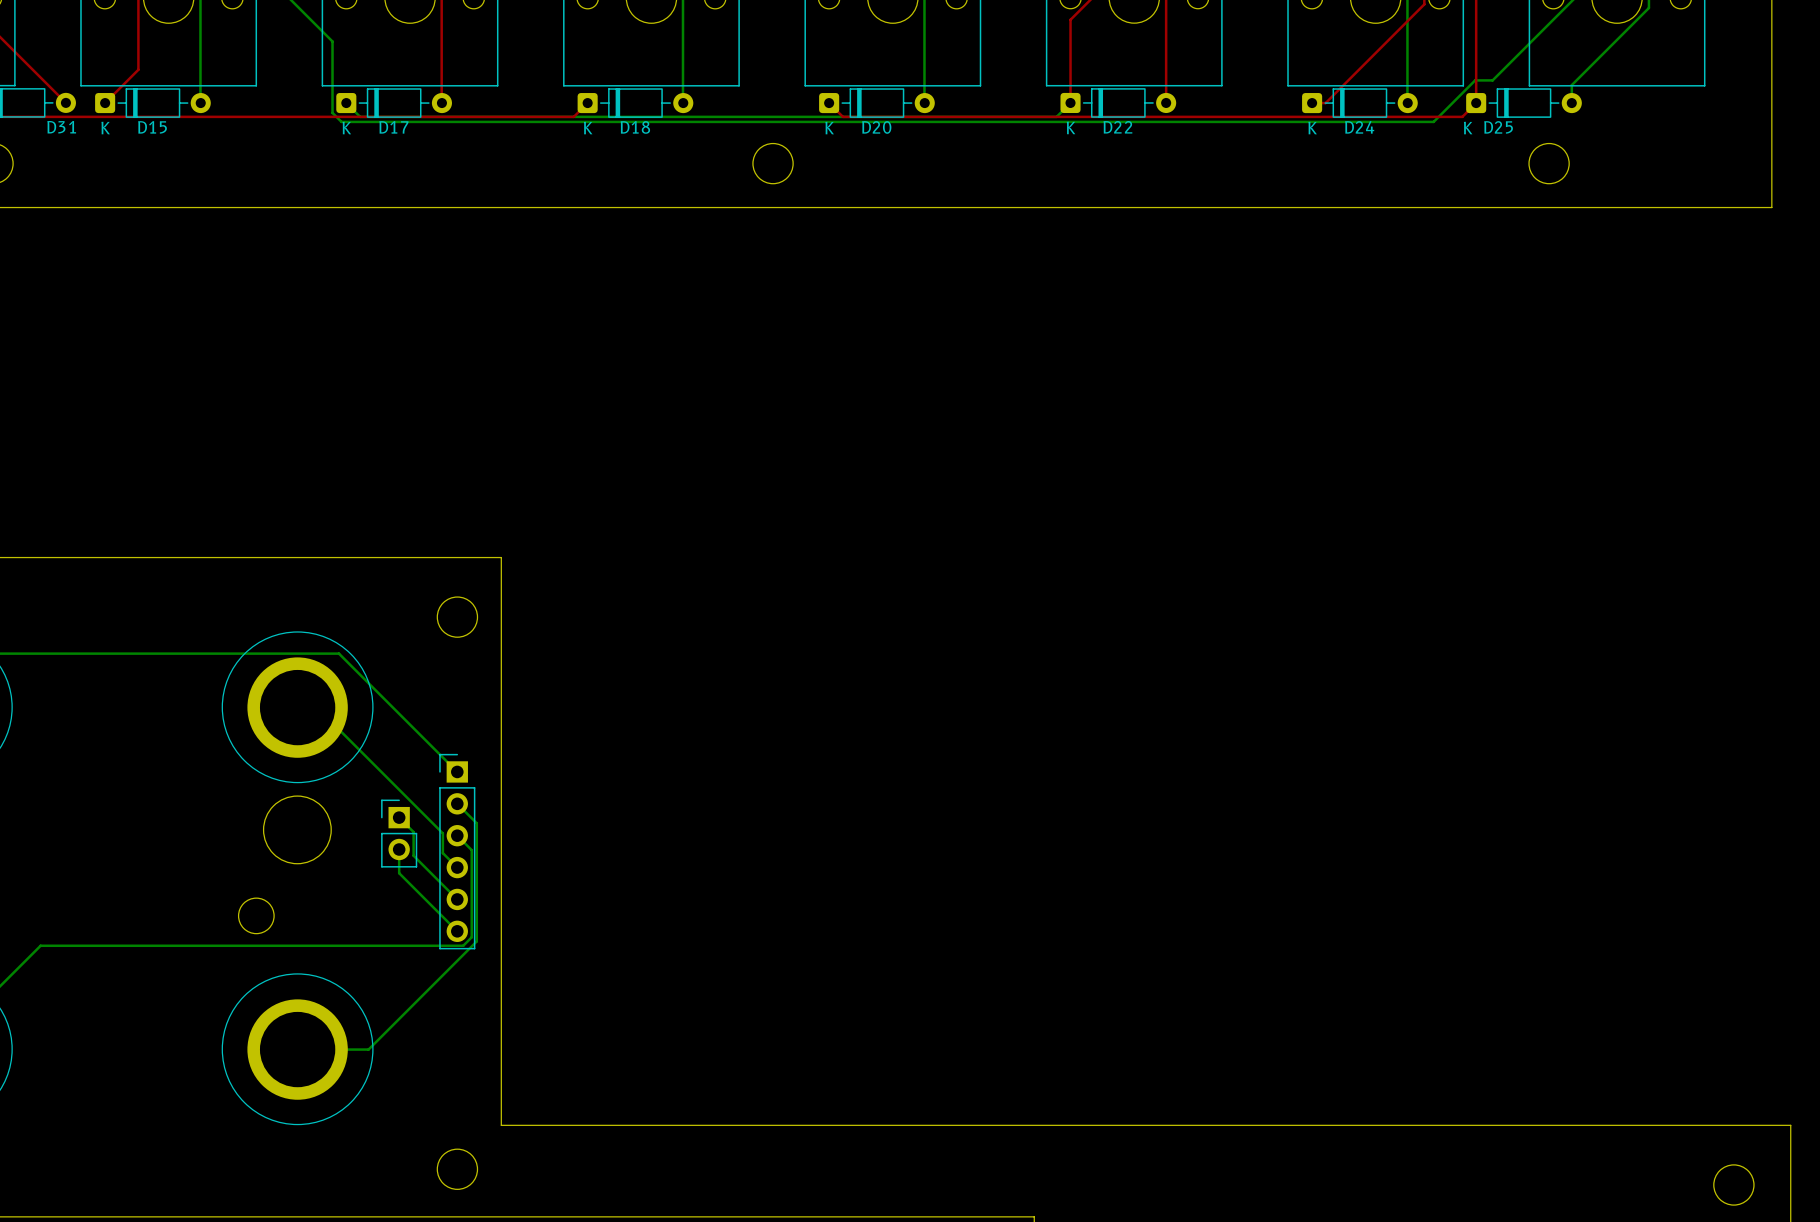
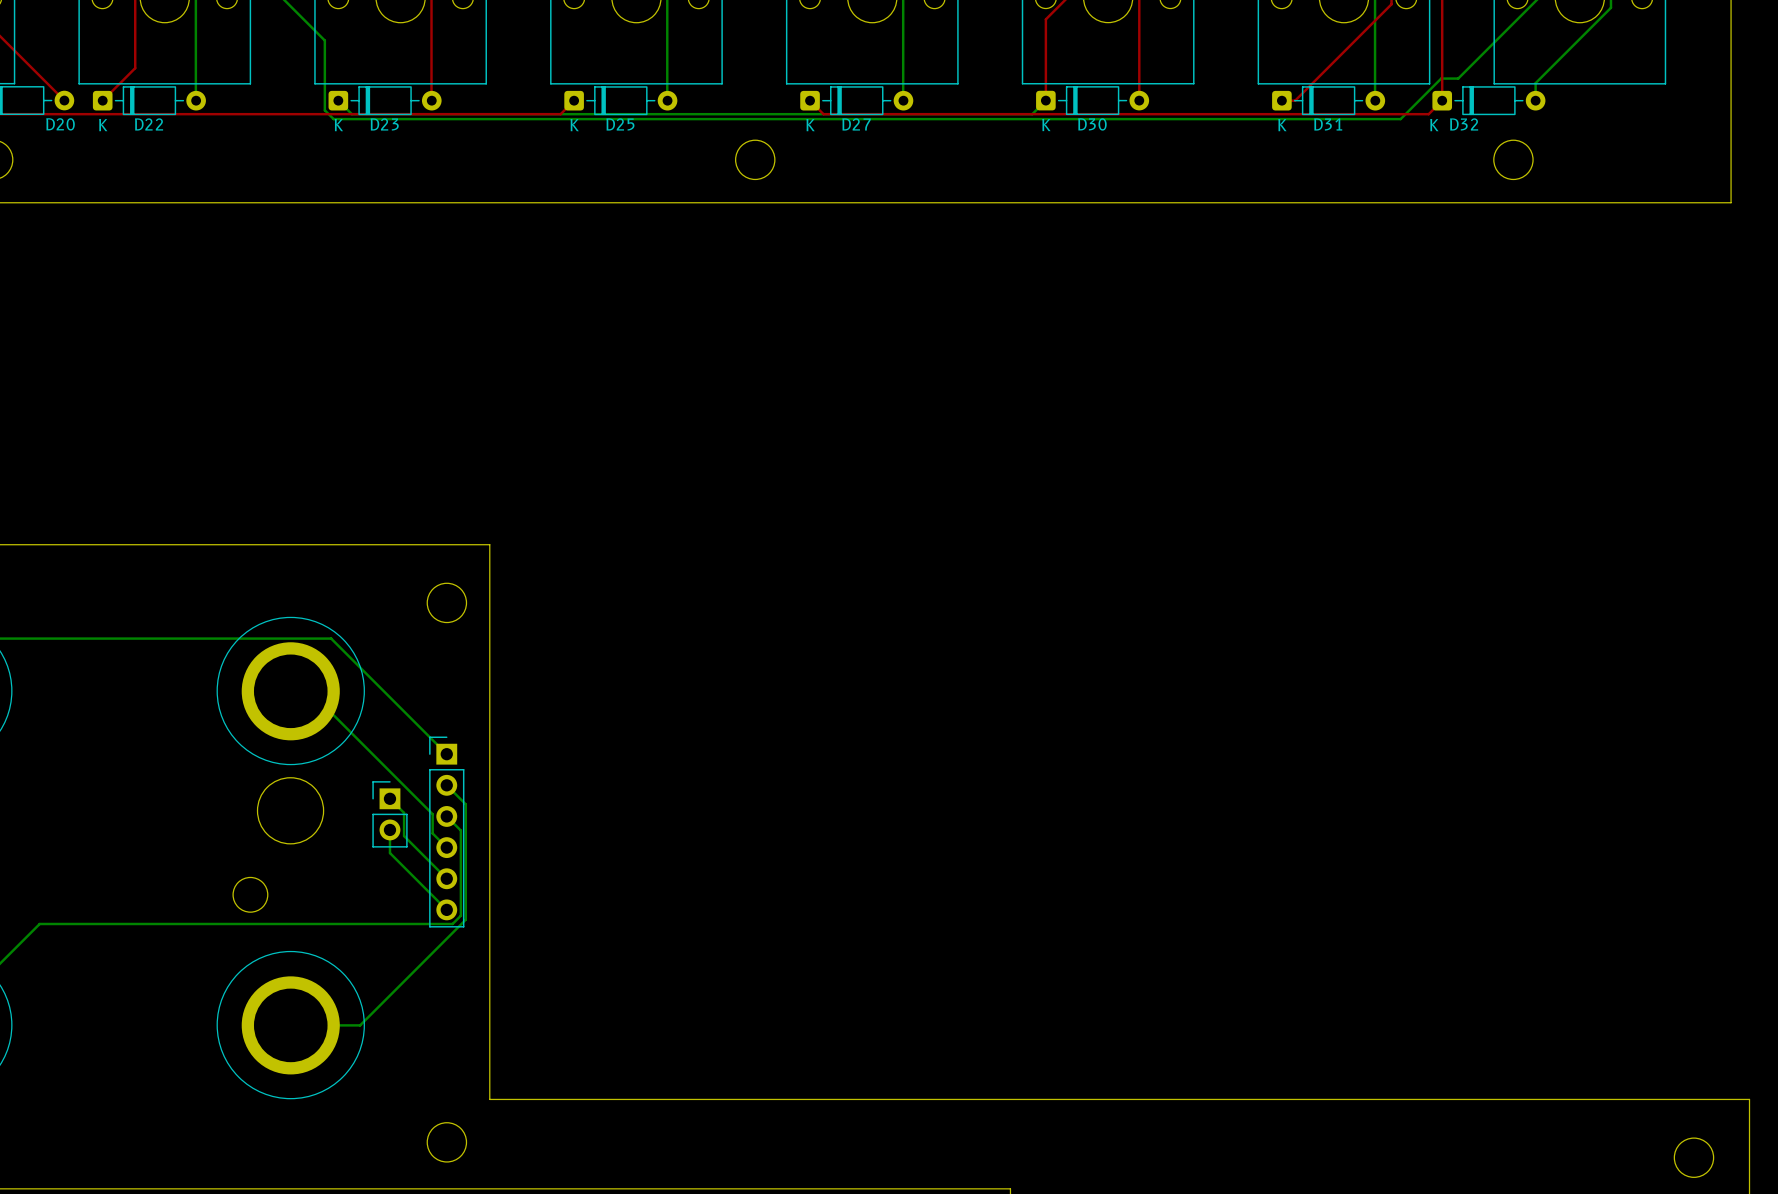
D31 name: D31 (61, 127) -> D20 (60, 124)
D15 name: D15 (152, 127) -> D22 (149, 124)
D17 name: D17 (393, 127) -> D23 (384, 124)
D18 name: D18 (635, 127) -> D25 (620, 124)
D20 name: D20 (876, 127) -> D27 (856, 124)
D22 name: D22 (1117, 127) -> D30 (1092, 124)
D24 name: D24 (1359, 127) -> D31 (1328, 124)
D25 name: D25 (1498, 127) -> D32 (1464, 124)

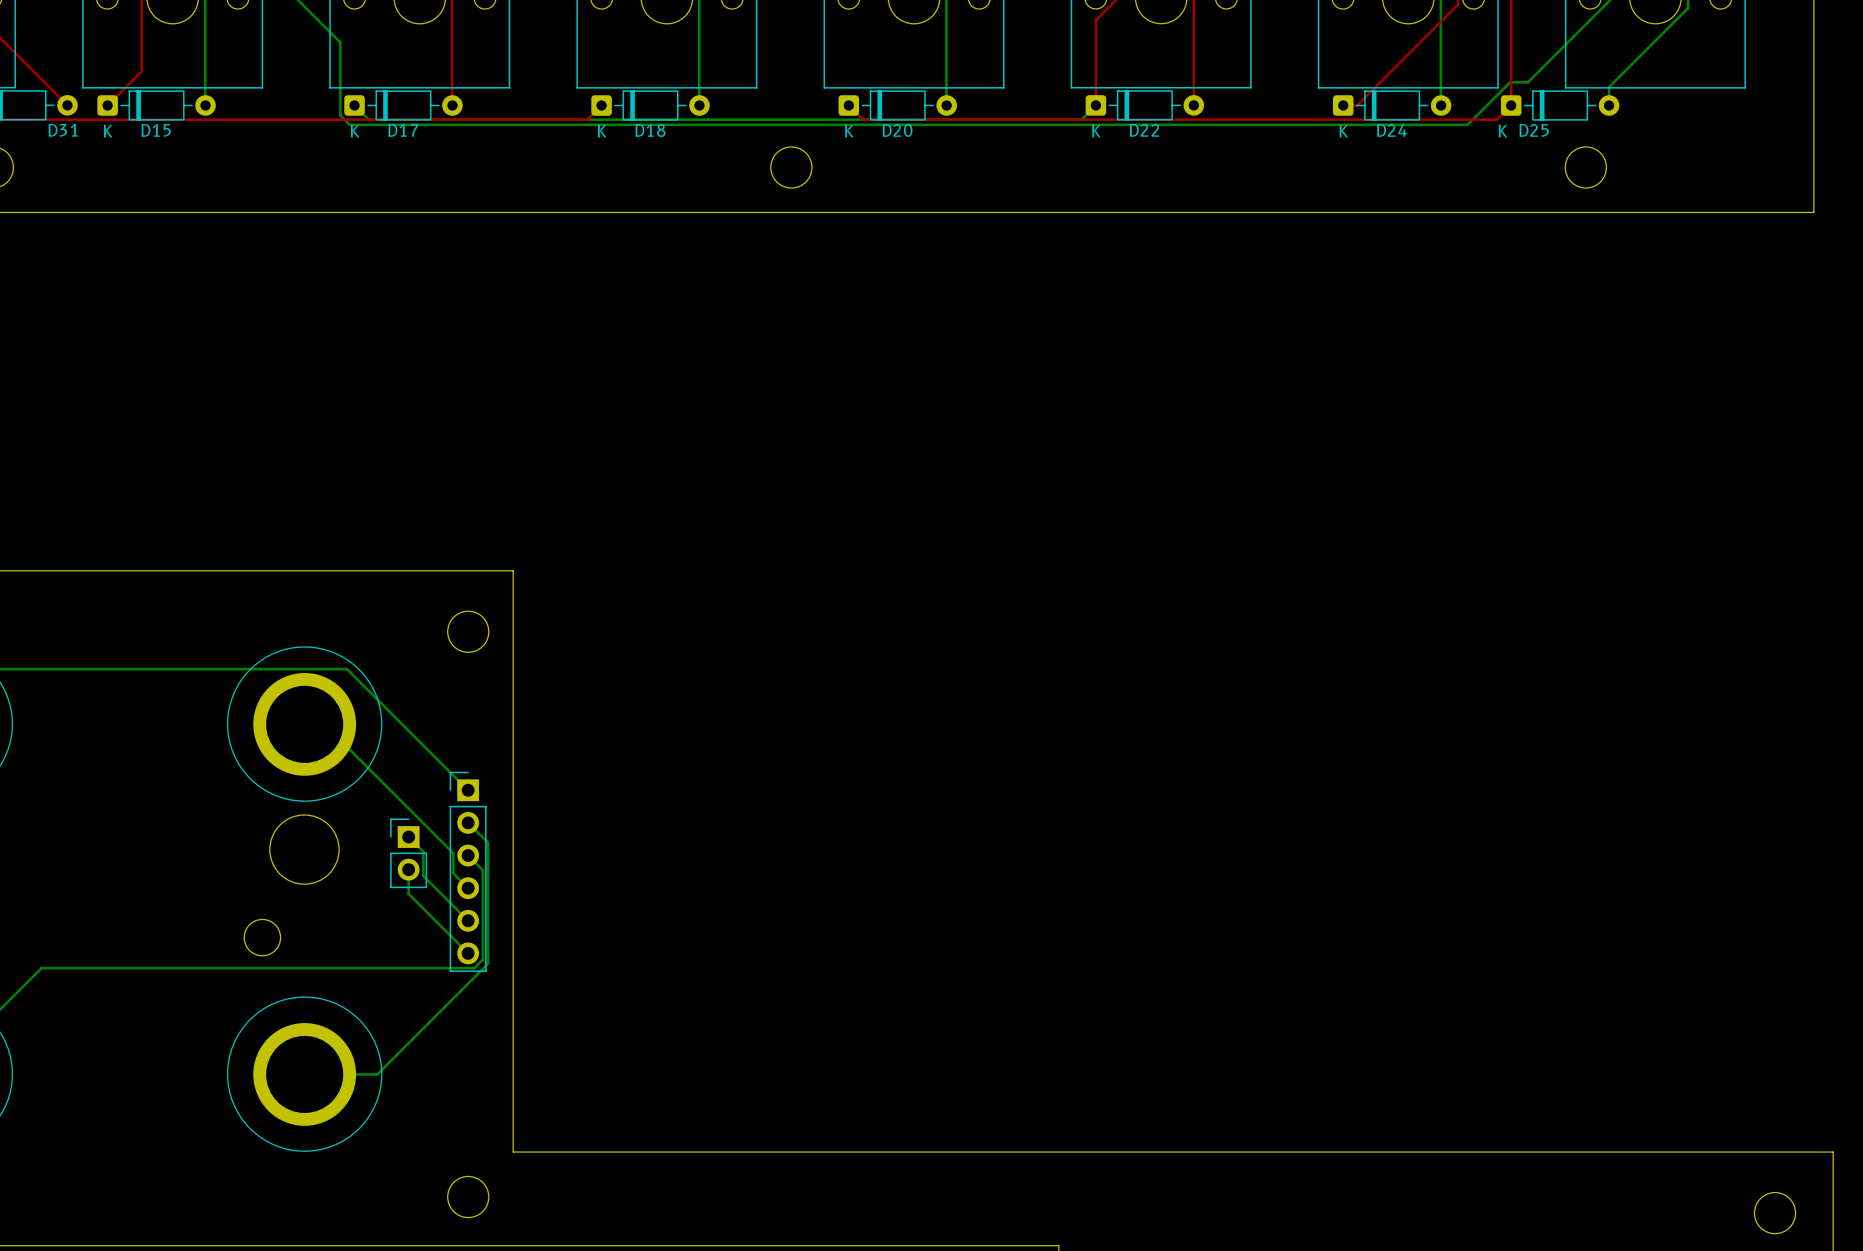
D20 name: D20 (60, 124) -> D31 (63, 130)
D22 name: D22 (149, 124) -> D15 (156, 130)
D23 name: D23 (384, 124) -> D17 (403, 130)
D25 name: D25 (620, 124) -> D18 (650, 130)
D27 name: D27 (856, 124) -> D20 (897, 130)
D30 name: D30 (1092, 124) -> D22 (1144, 130)
D31 name: D31 (1328, 124) -> D24 (1391, 130)
D32 name: D32 (1464, 124) -> D25 (1534, 130)

